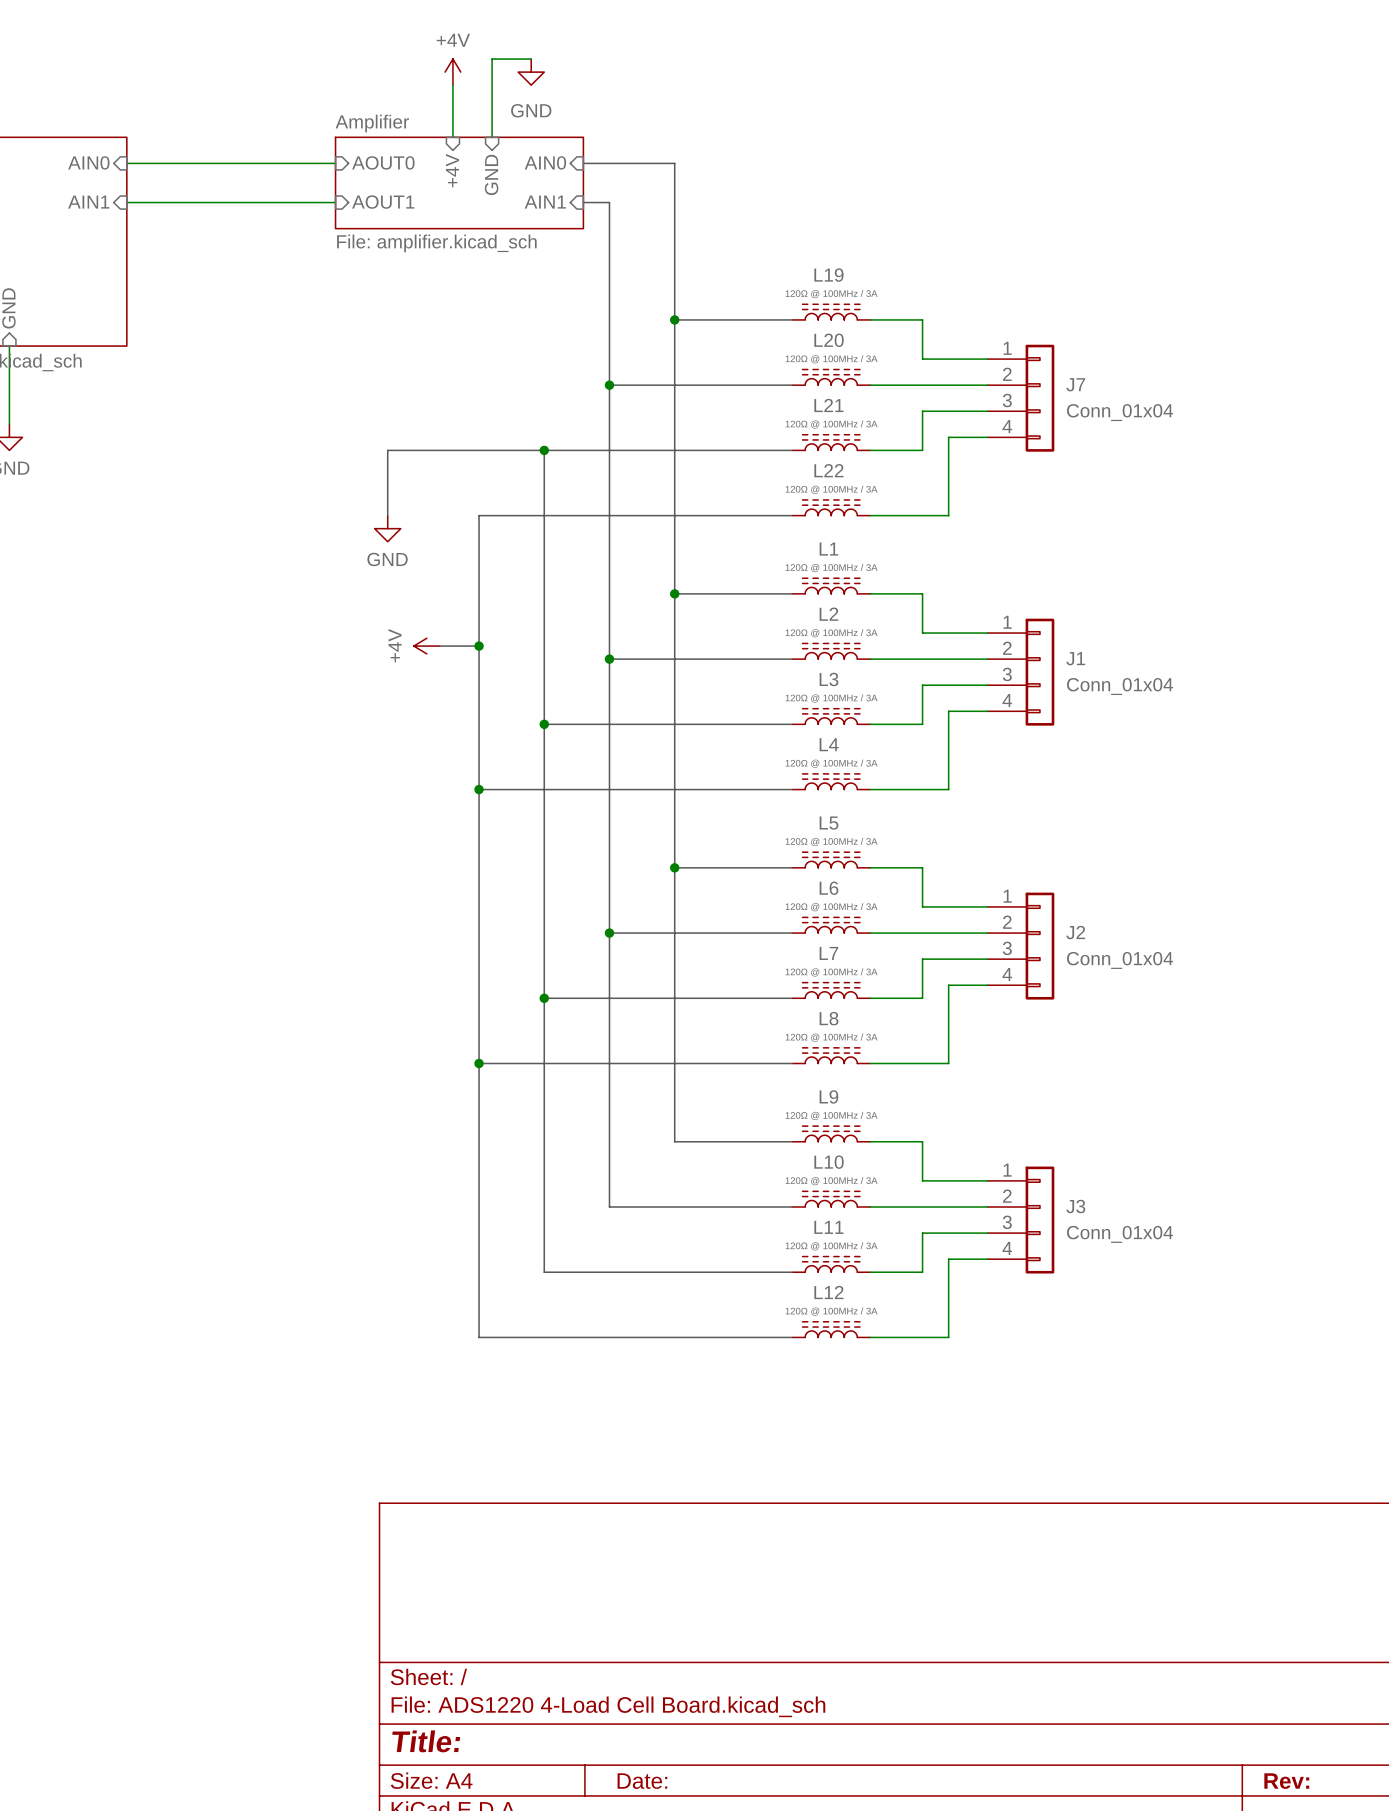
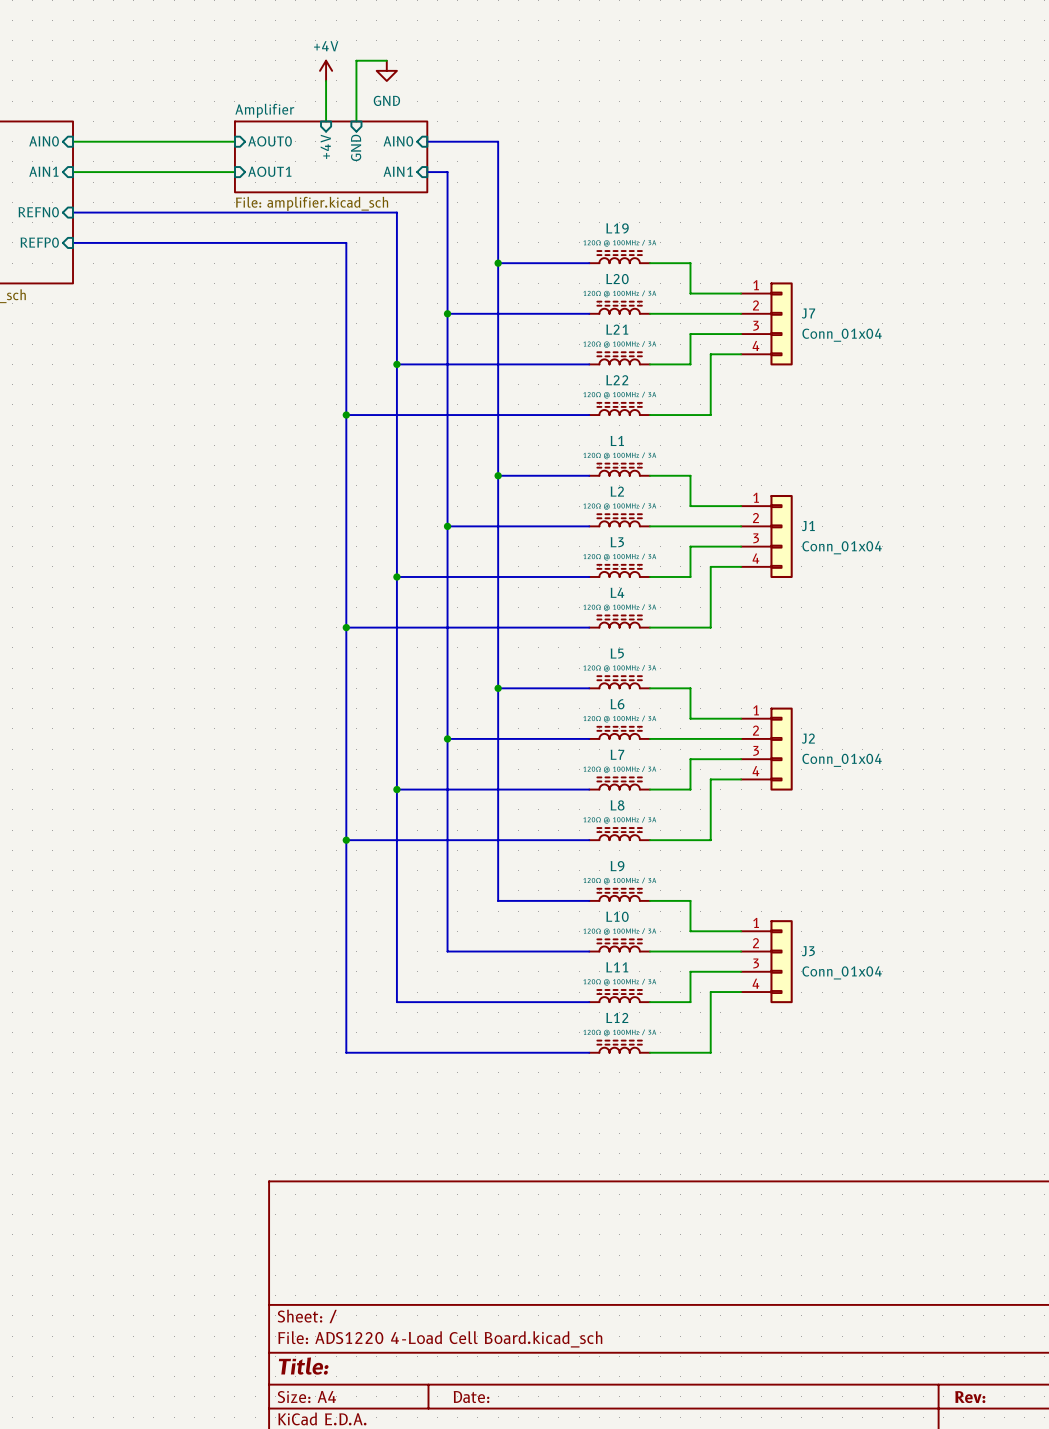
sheet pin: none -> REFN0 (38, 212)
sheet pin: none -> REFP0 (39, 242)
bus: none -> (73, 242) (346, 242) (346, 415)
bus: (544, 450) (387, 450) (387, 515) -> (396, 364) (396, 212) (73, 212)
junction: none -> (346, 415)
power symbol: GND (387, 528) -> none
power symbol: +4V (426, 646) -> none
bus: (439, 646) (479, 646) -> none
junction: (479, 646) -> none

